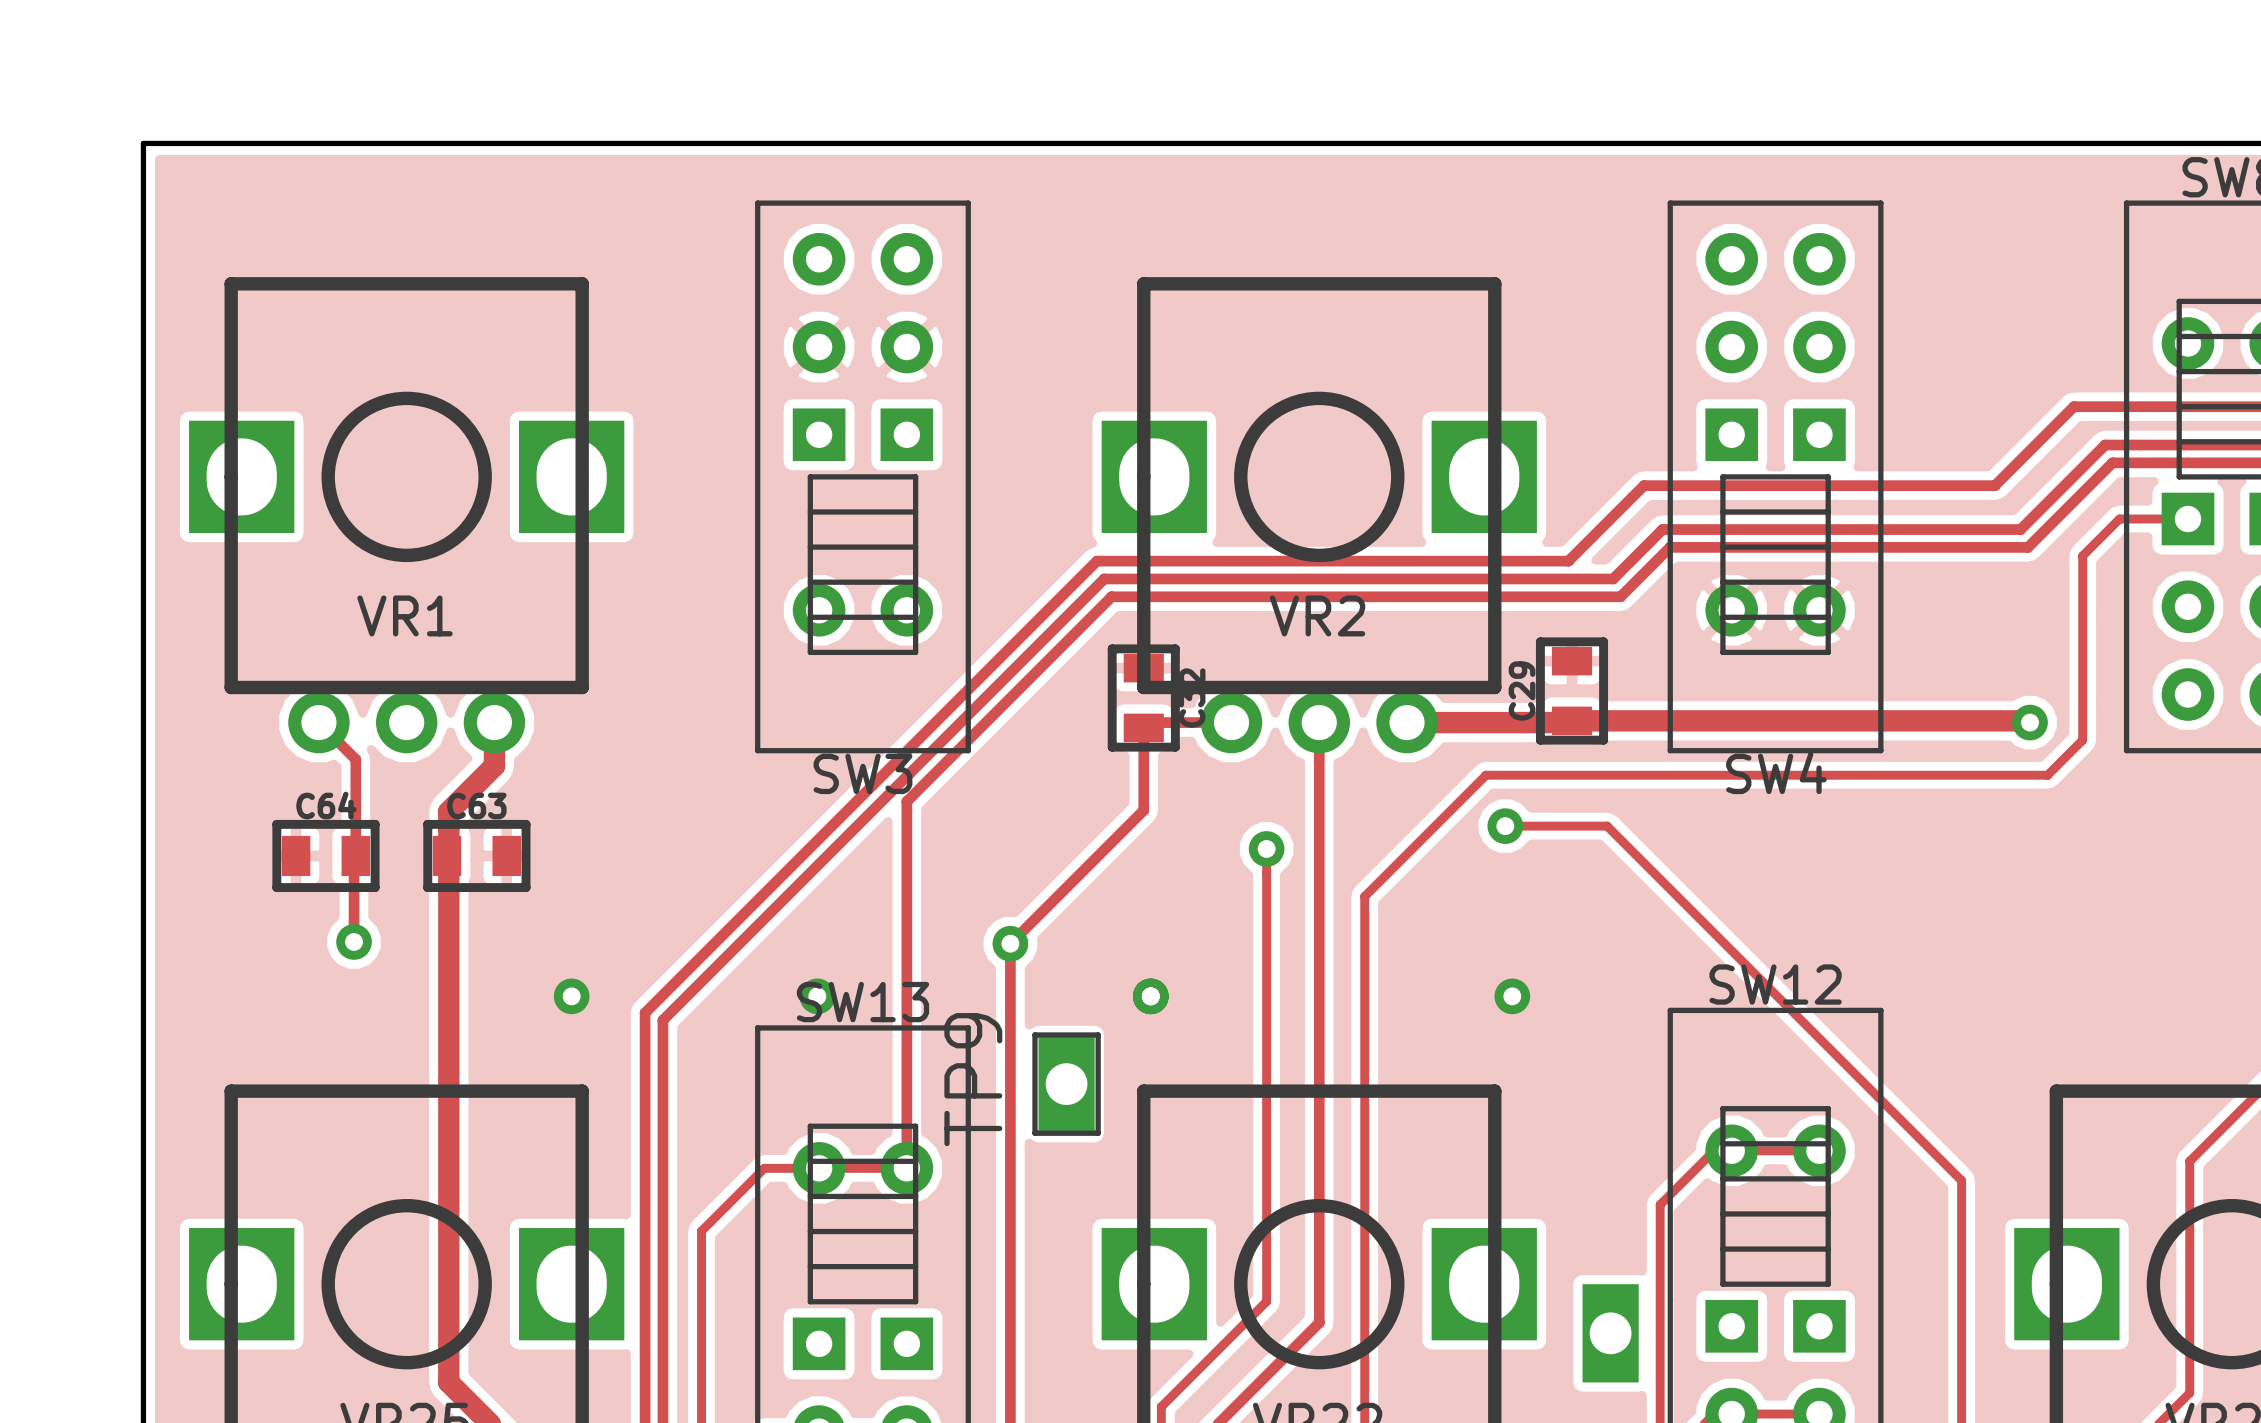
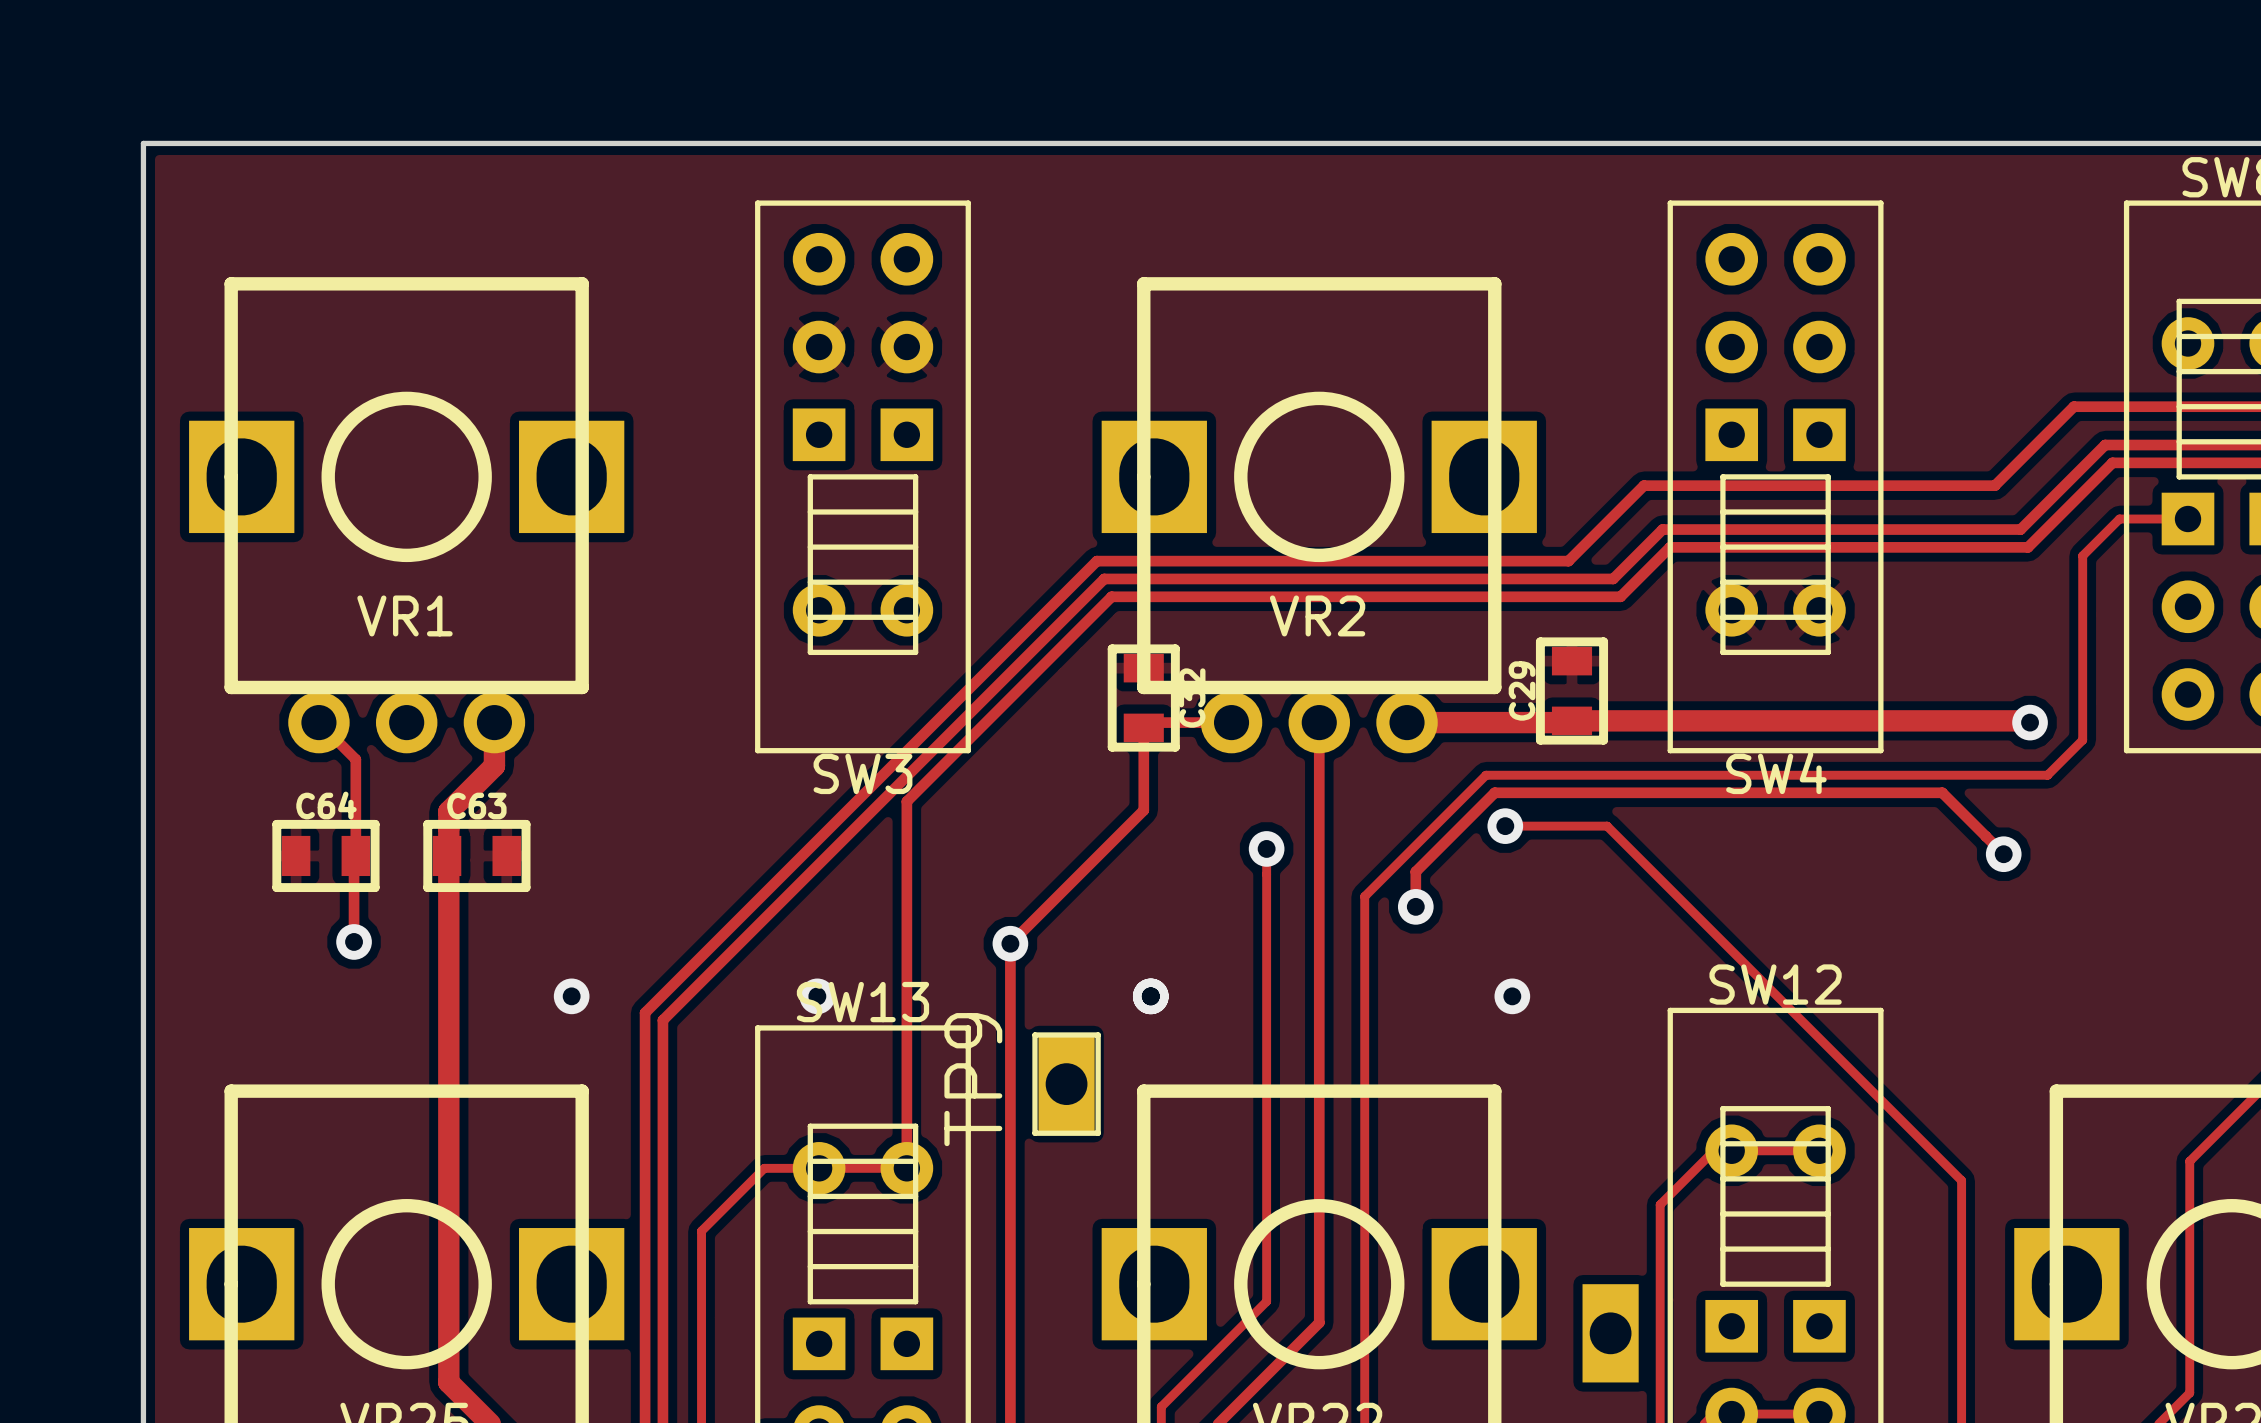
track: none -> (2003, 854) (1942, 792) (1494, 792) (1415, 871) (1415, 906)
via: none -> (2003, 854)
via: none -> (1415, 906)

